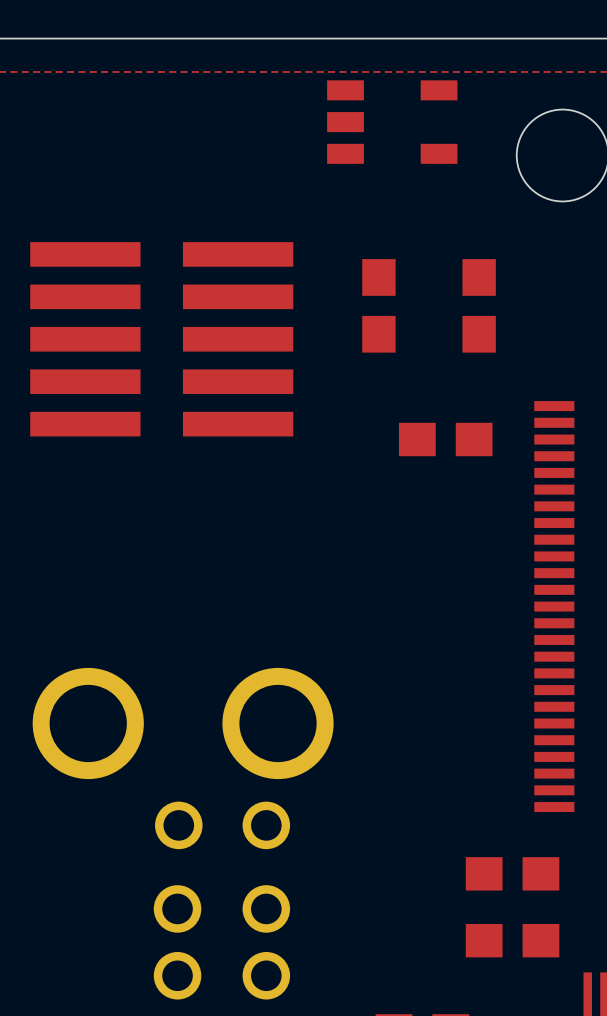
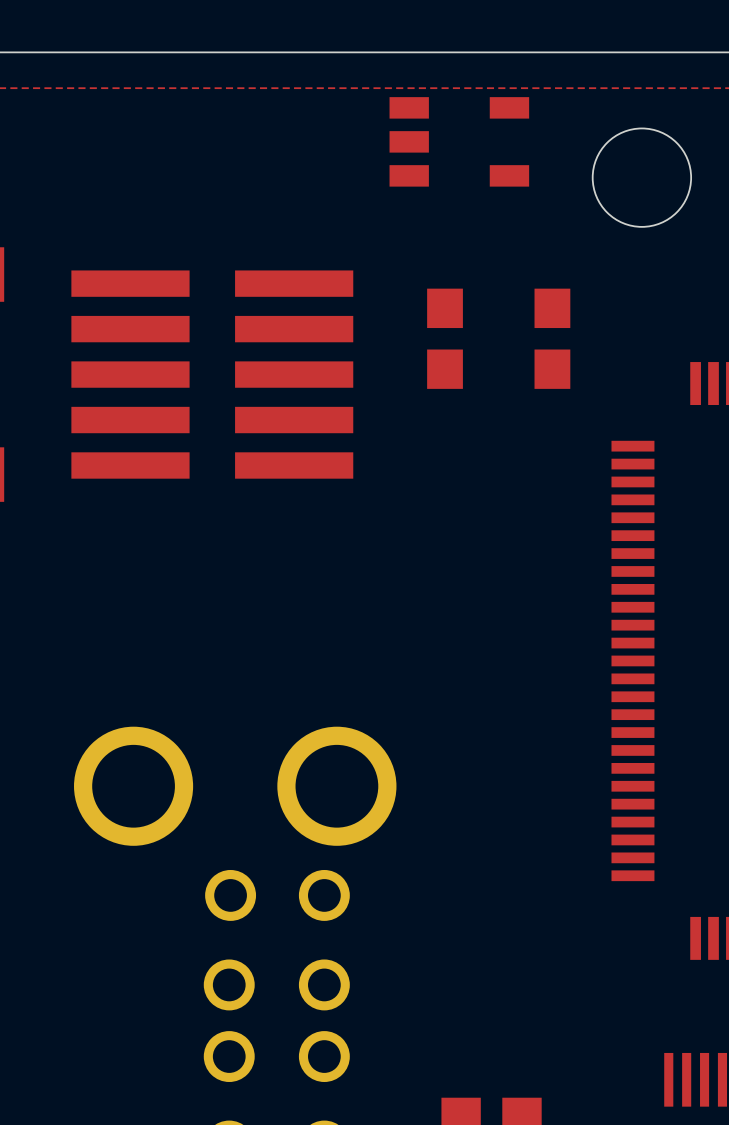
part: (445, 439) -> none
part: (512, 873) -> none
part: (512, 940) -> none

